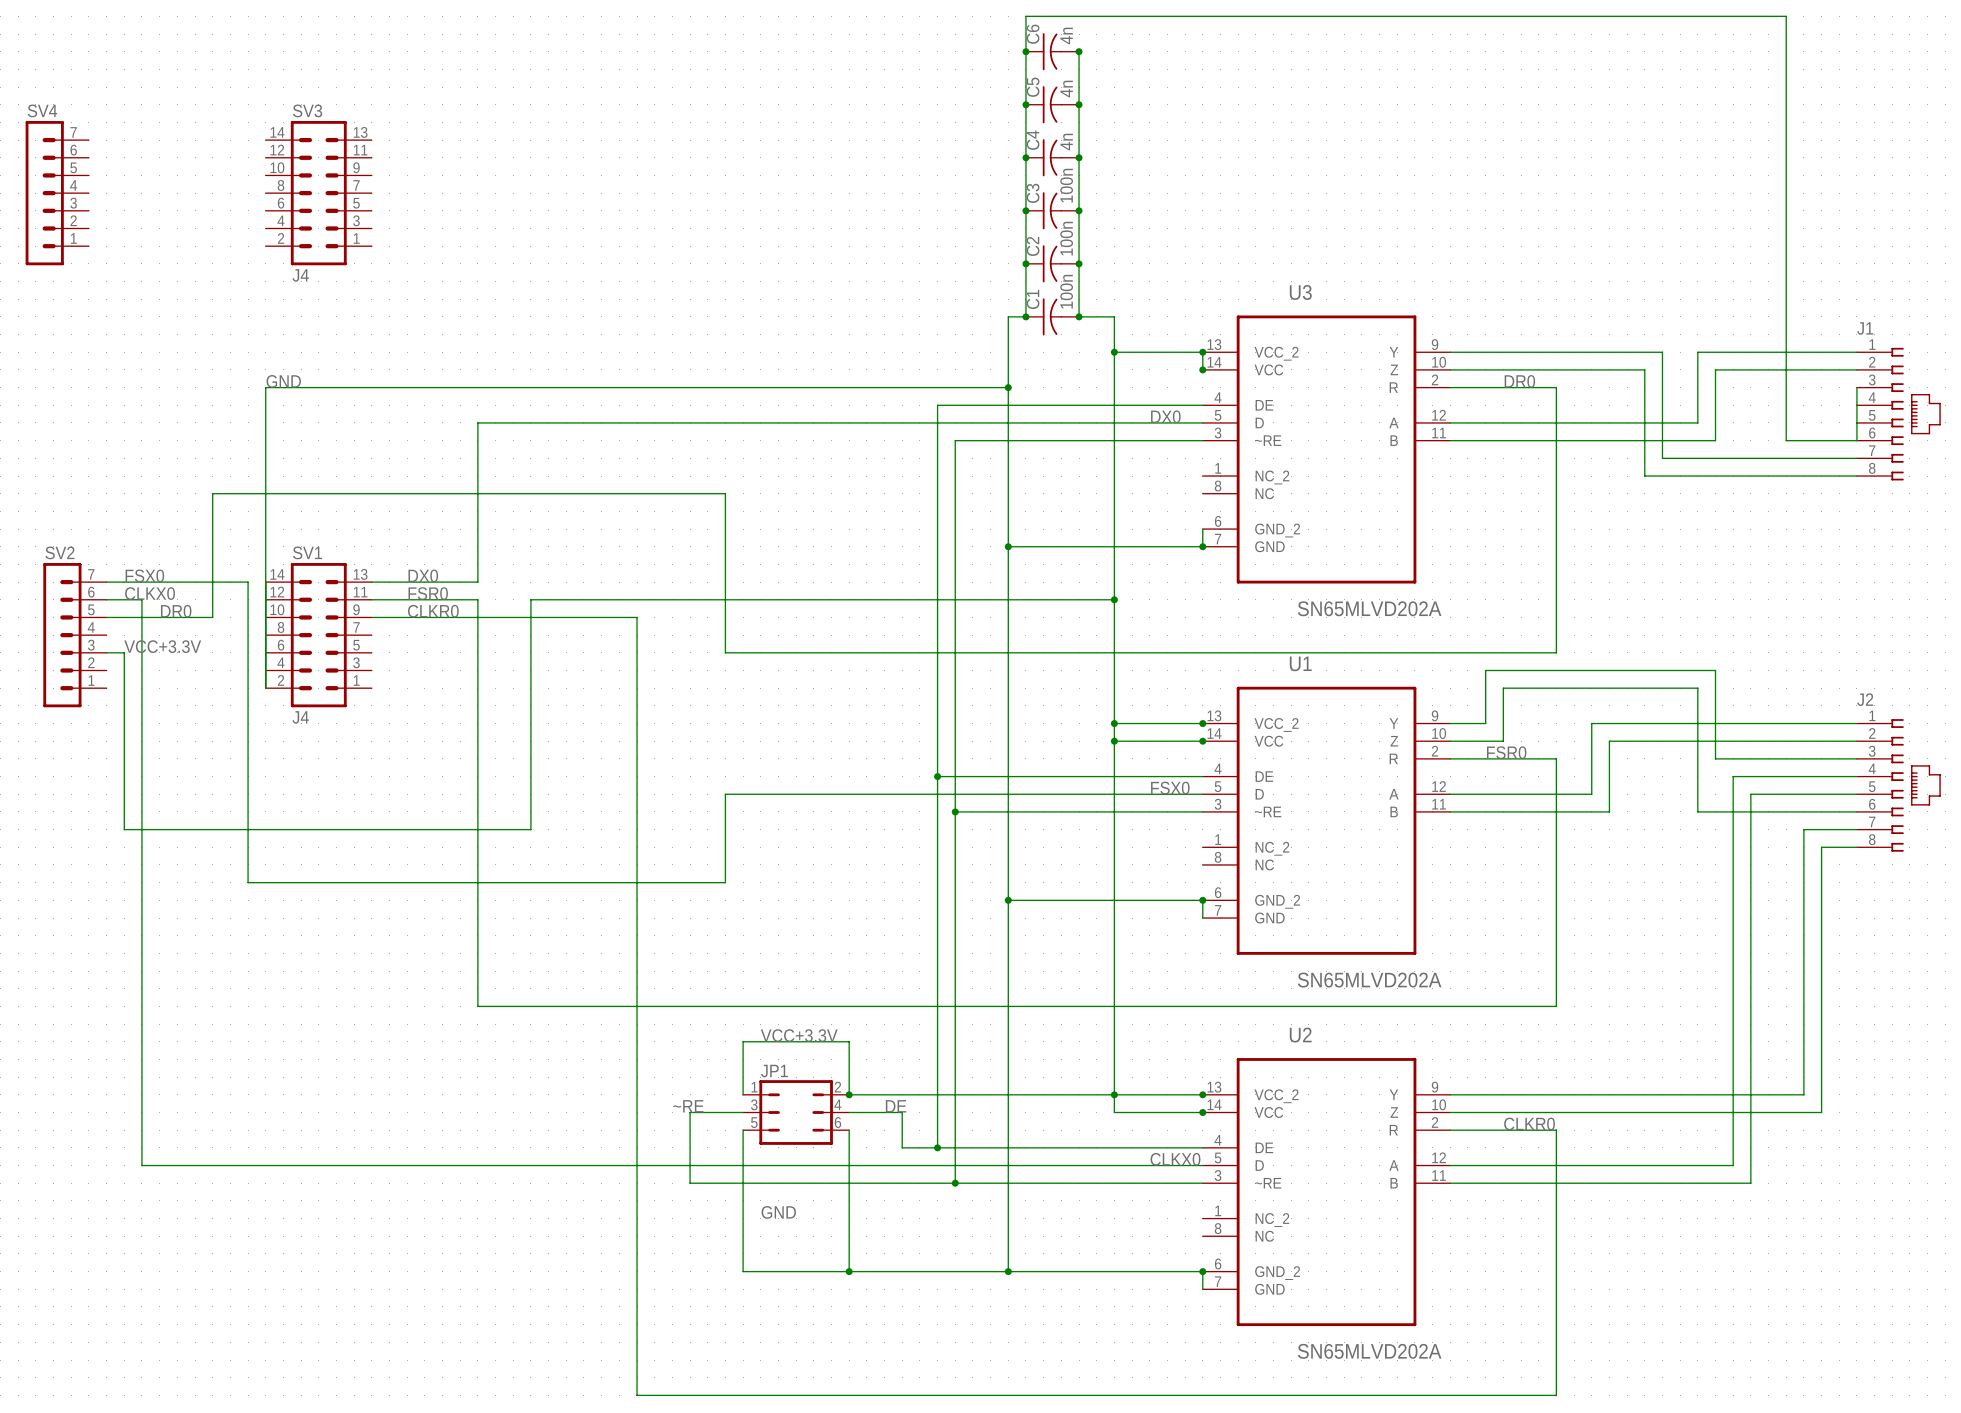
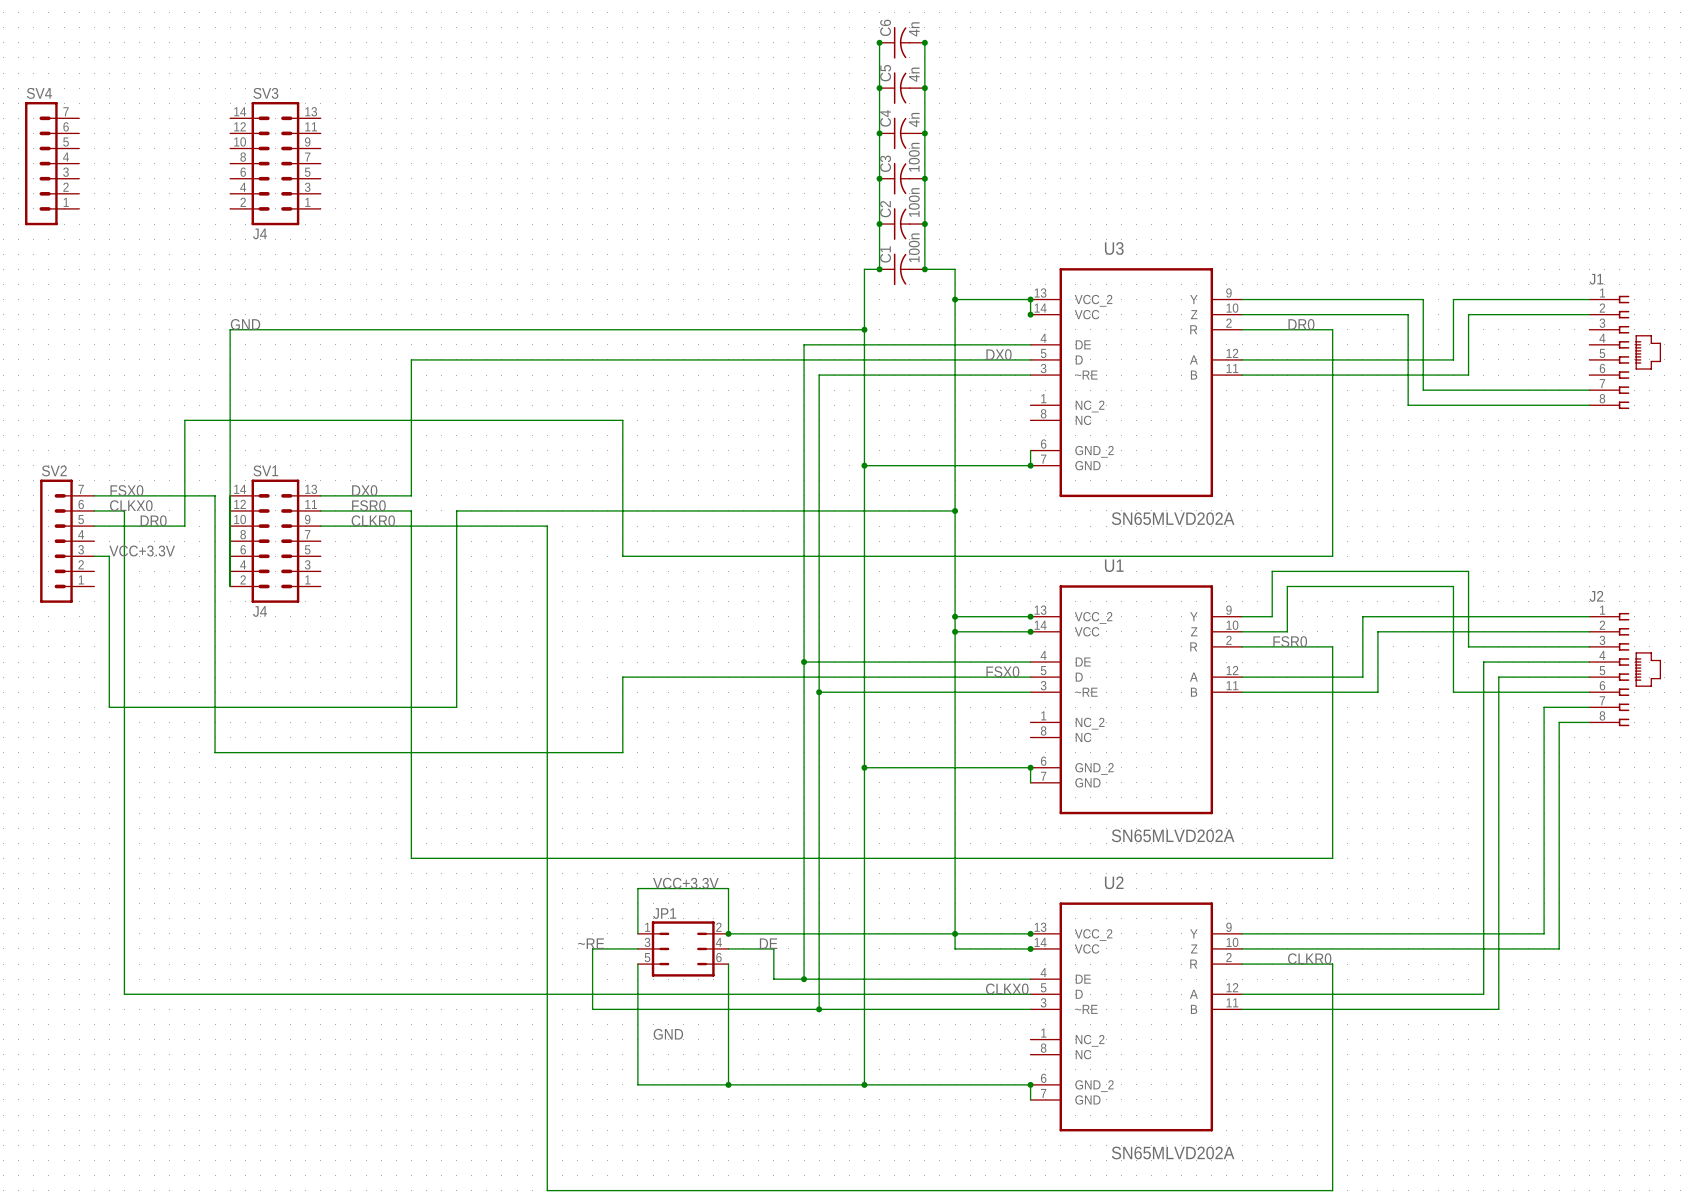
wire: (1025, 51) (1025, 16) (1786, 16) (1786, 440) (1856, 440) (1856, 387) -> none

